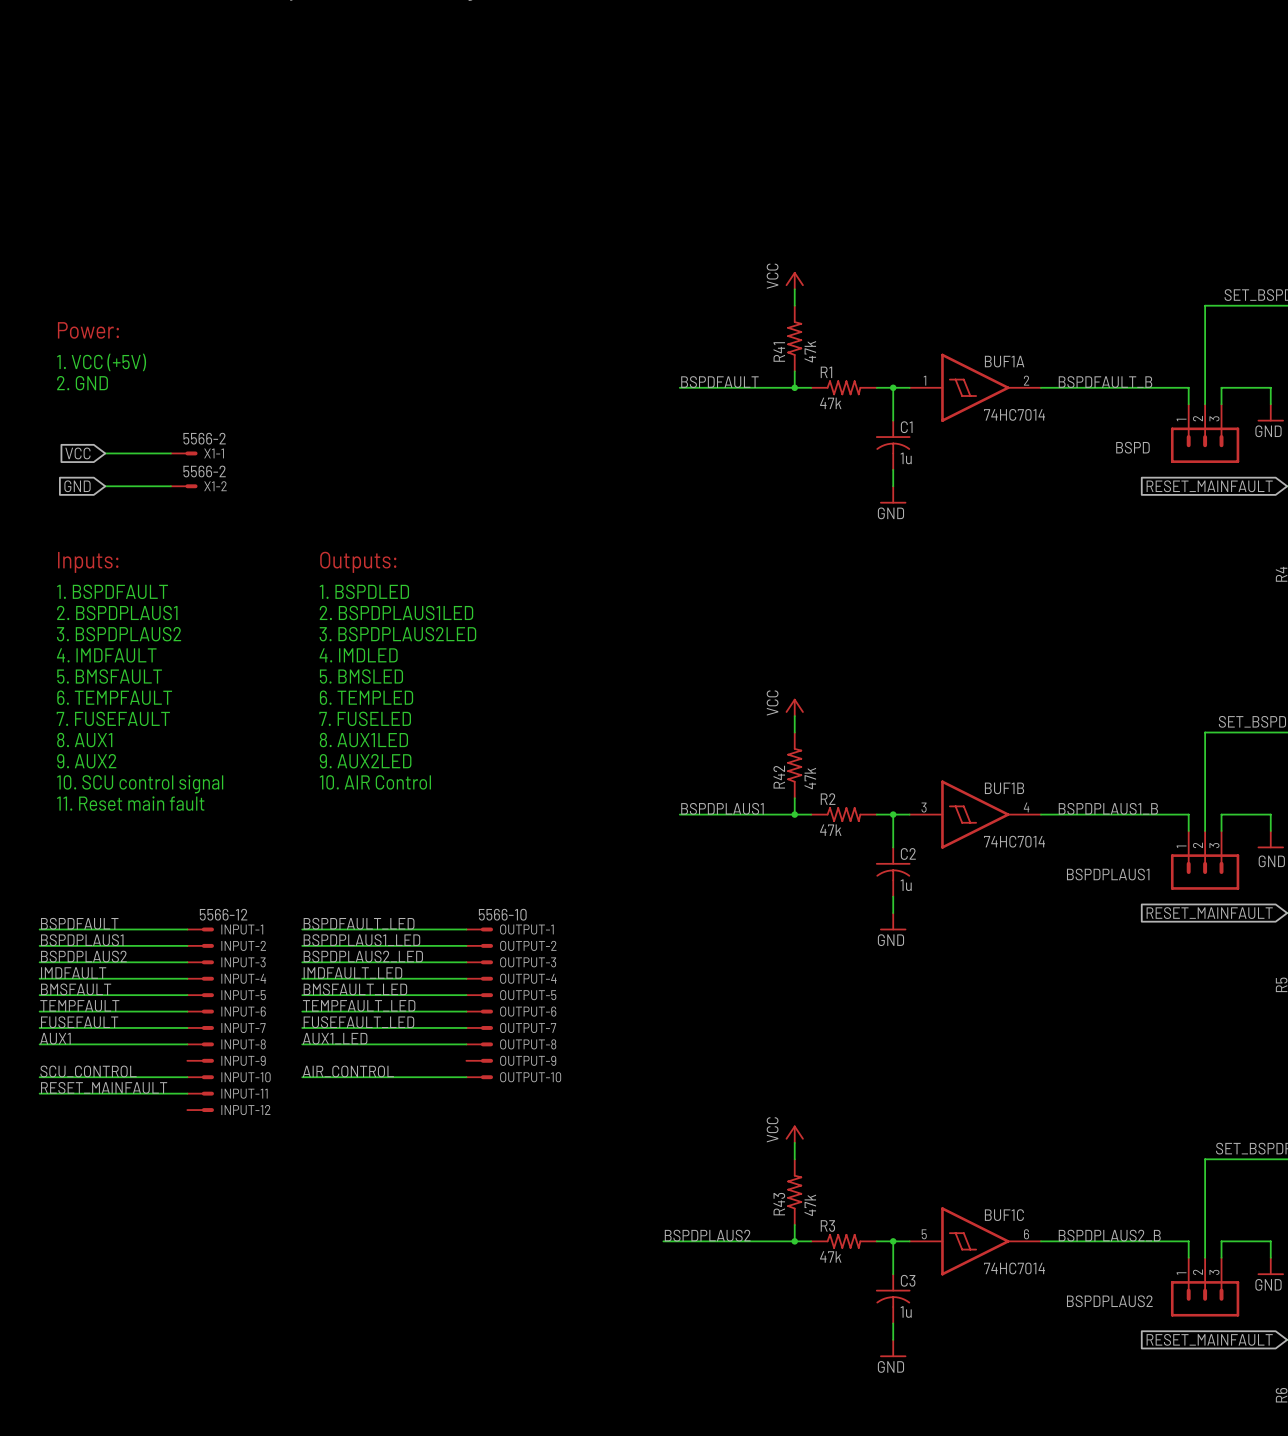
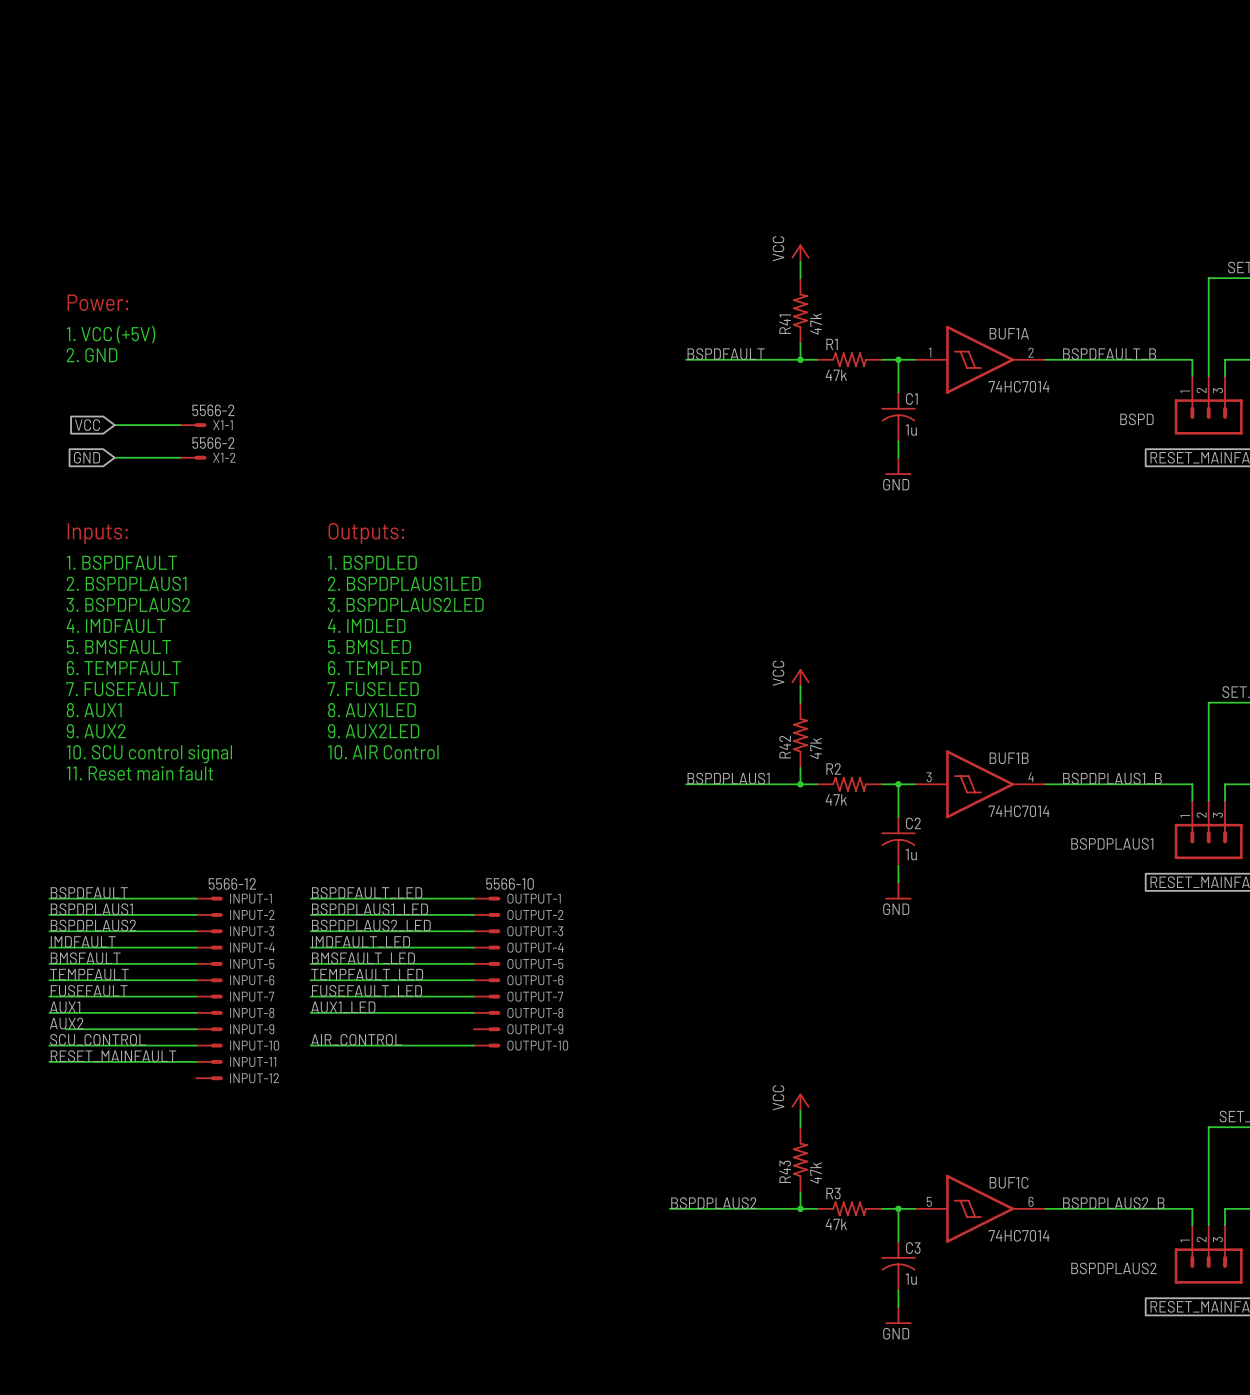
label: none -> AUX2 (66, 1023)
wire: none -> (65, 1029) (196, 1029)

